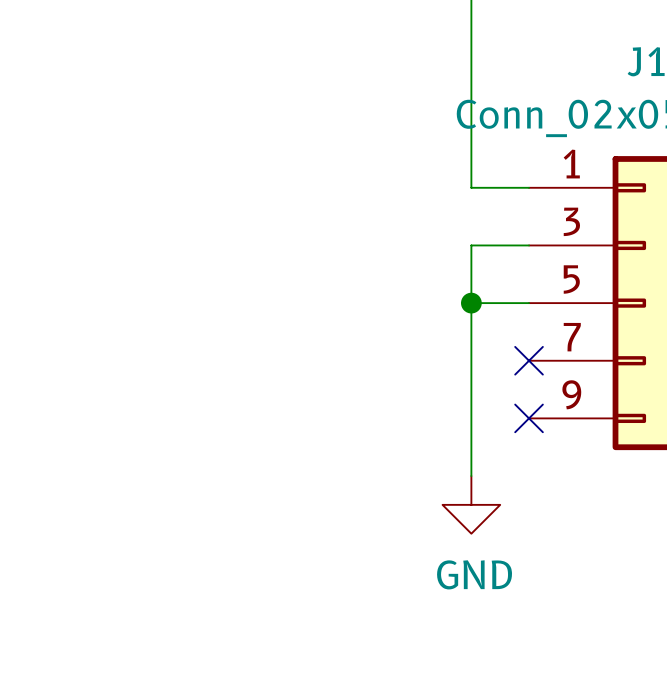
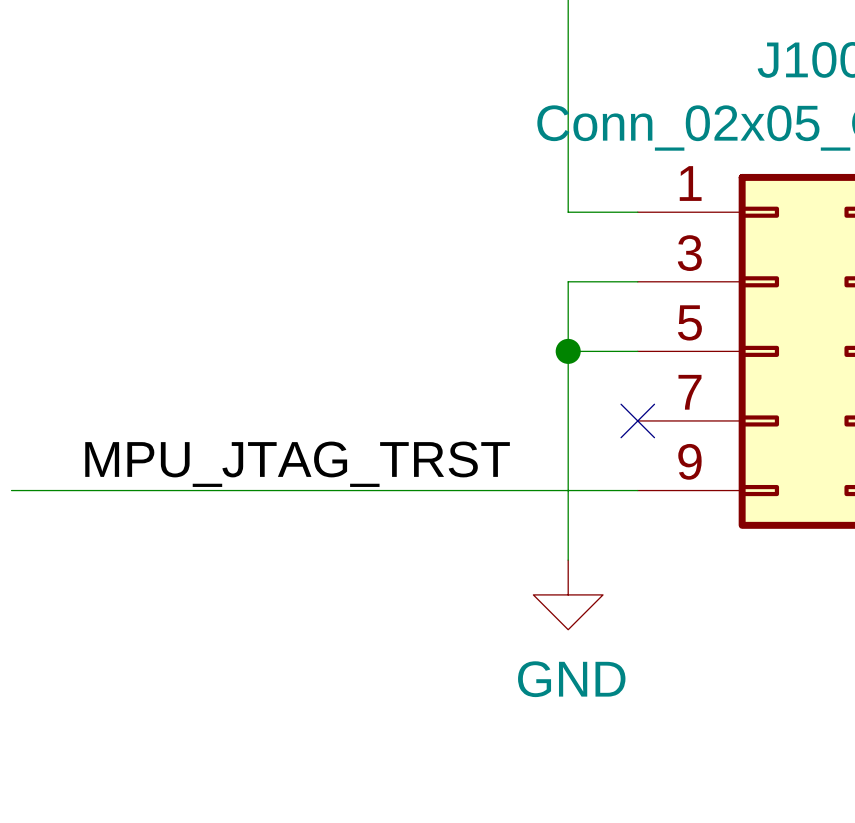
label: none -> MPU_JTAG_TRST (297, 464)
wire: none -> (11, 490) (637, 490)
no-connect mark: (529, 418) -> none

